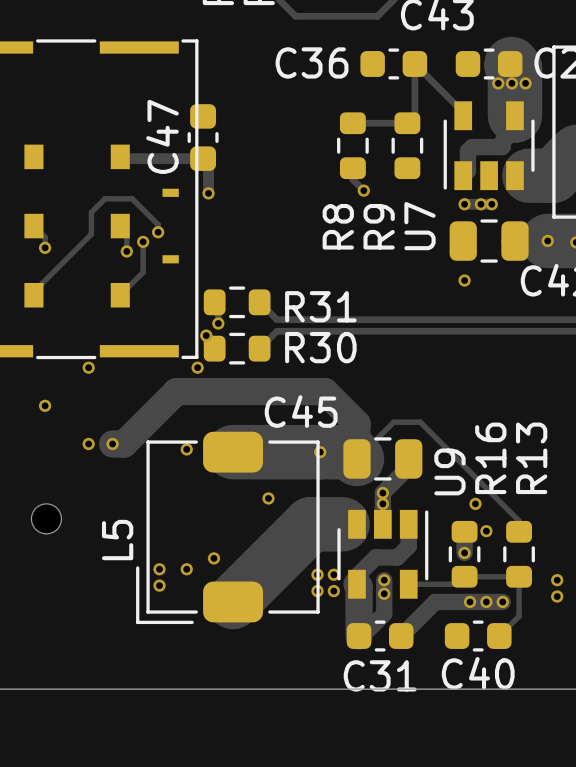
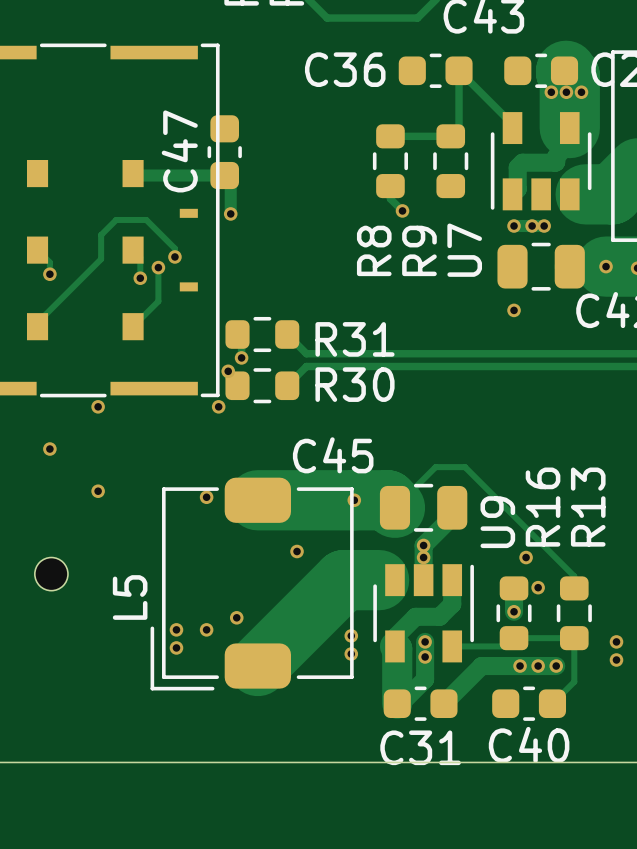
track: (112, 443) (124, 443) (176, 391) (325, 391) (356, 423) (356, 458) -> none
via: (112, 443) -> none
via: (333, 574) -> none
via: (333, 591) -> none

